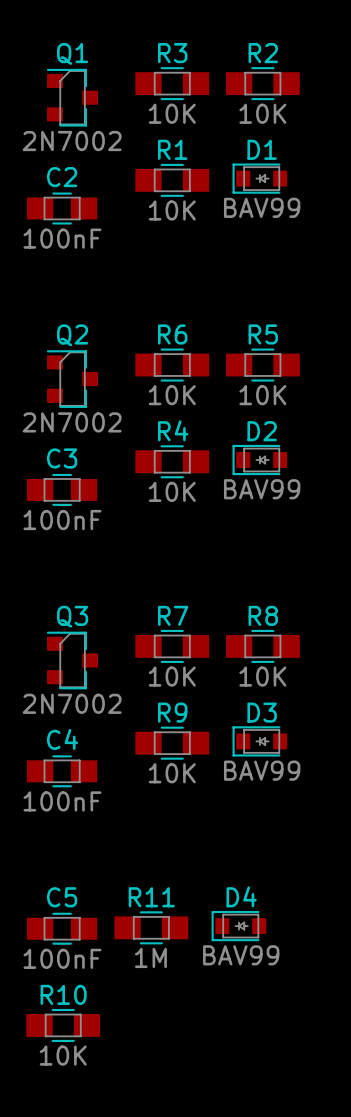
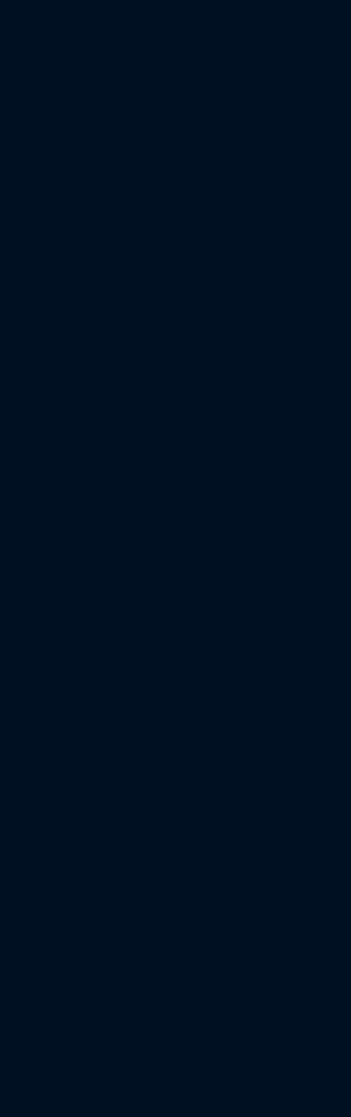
R3: 10K (172, 83) -> none
R2: 10K (262, 83) -> none
Q1: 2N7002 (72, 97) -> none
D1: BAV99 (259, 178) -> none
R1: 10K (172, 180) -> none
C2: 100nF (62, 208) -> none
R6: 10K (172, 365) -> none
R5: 10K (262, 365) -> none
Q2: 2N7002 (72, 379) -> none
D2: BAV99 (259, 460) -> none
R4: 10K (172, 461) -> none
C3: 100nF (62, 489) -> none
R7: 10K (172, 646) -> none
R8: 10K (262, 646) -> none
Q3: 2N7002 (72, 660) -> none
D3: BAV99 (259, 741) -> none
R9: 10K (172, 743) -> none
C4: 100nF (62, 771) -> none
D4: BAV99 (238, 926) -> none
R11: 1M (151, 927) -> none
C5: 100nF (62, 928) -> none
R10: 10K (63, 1025) -> none

